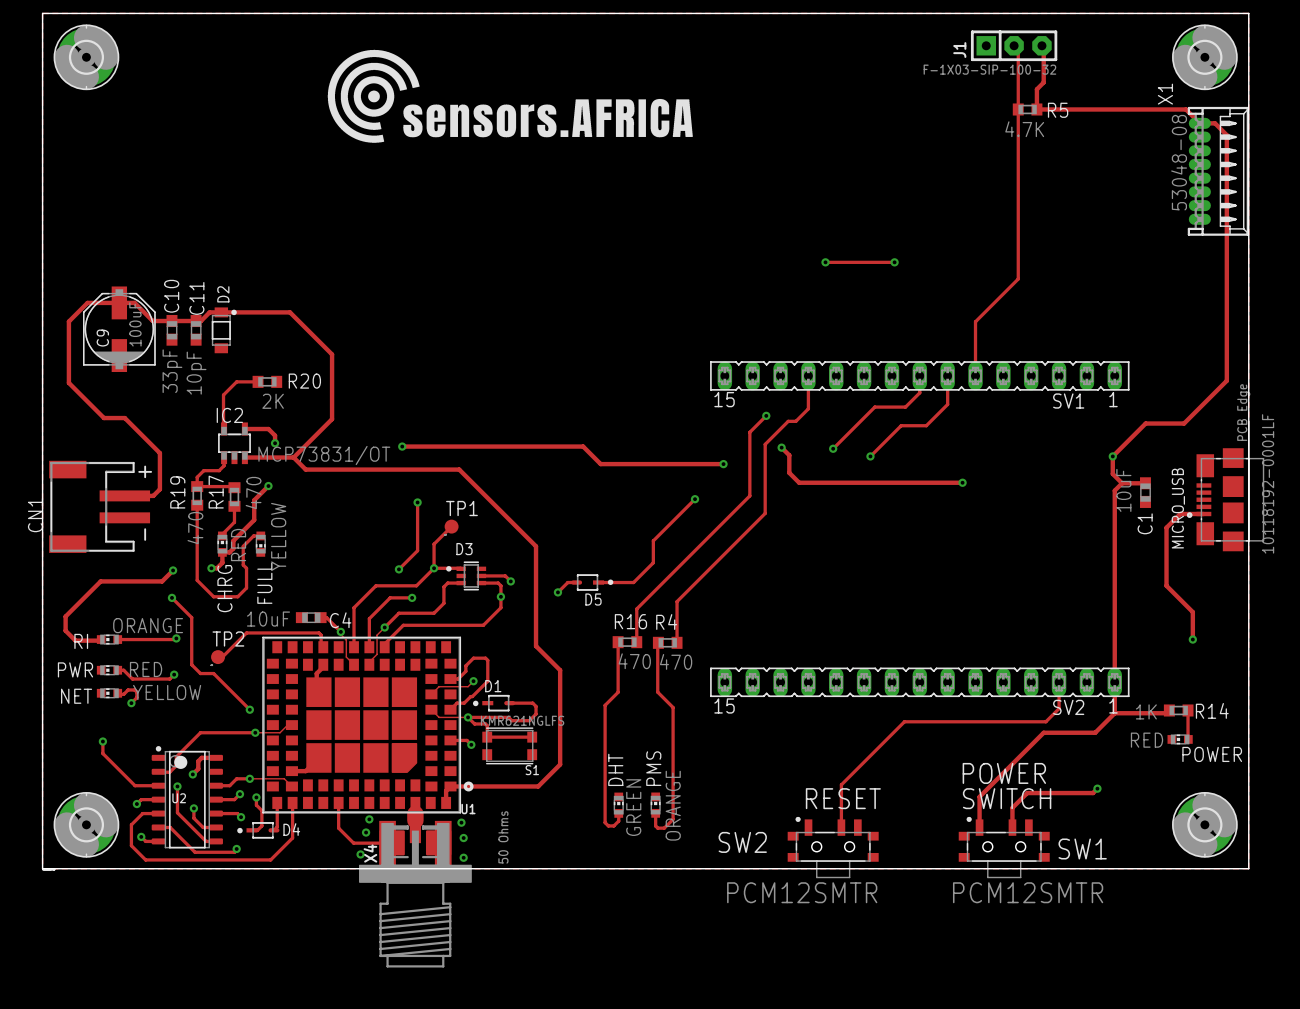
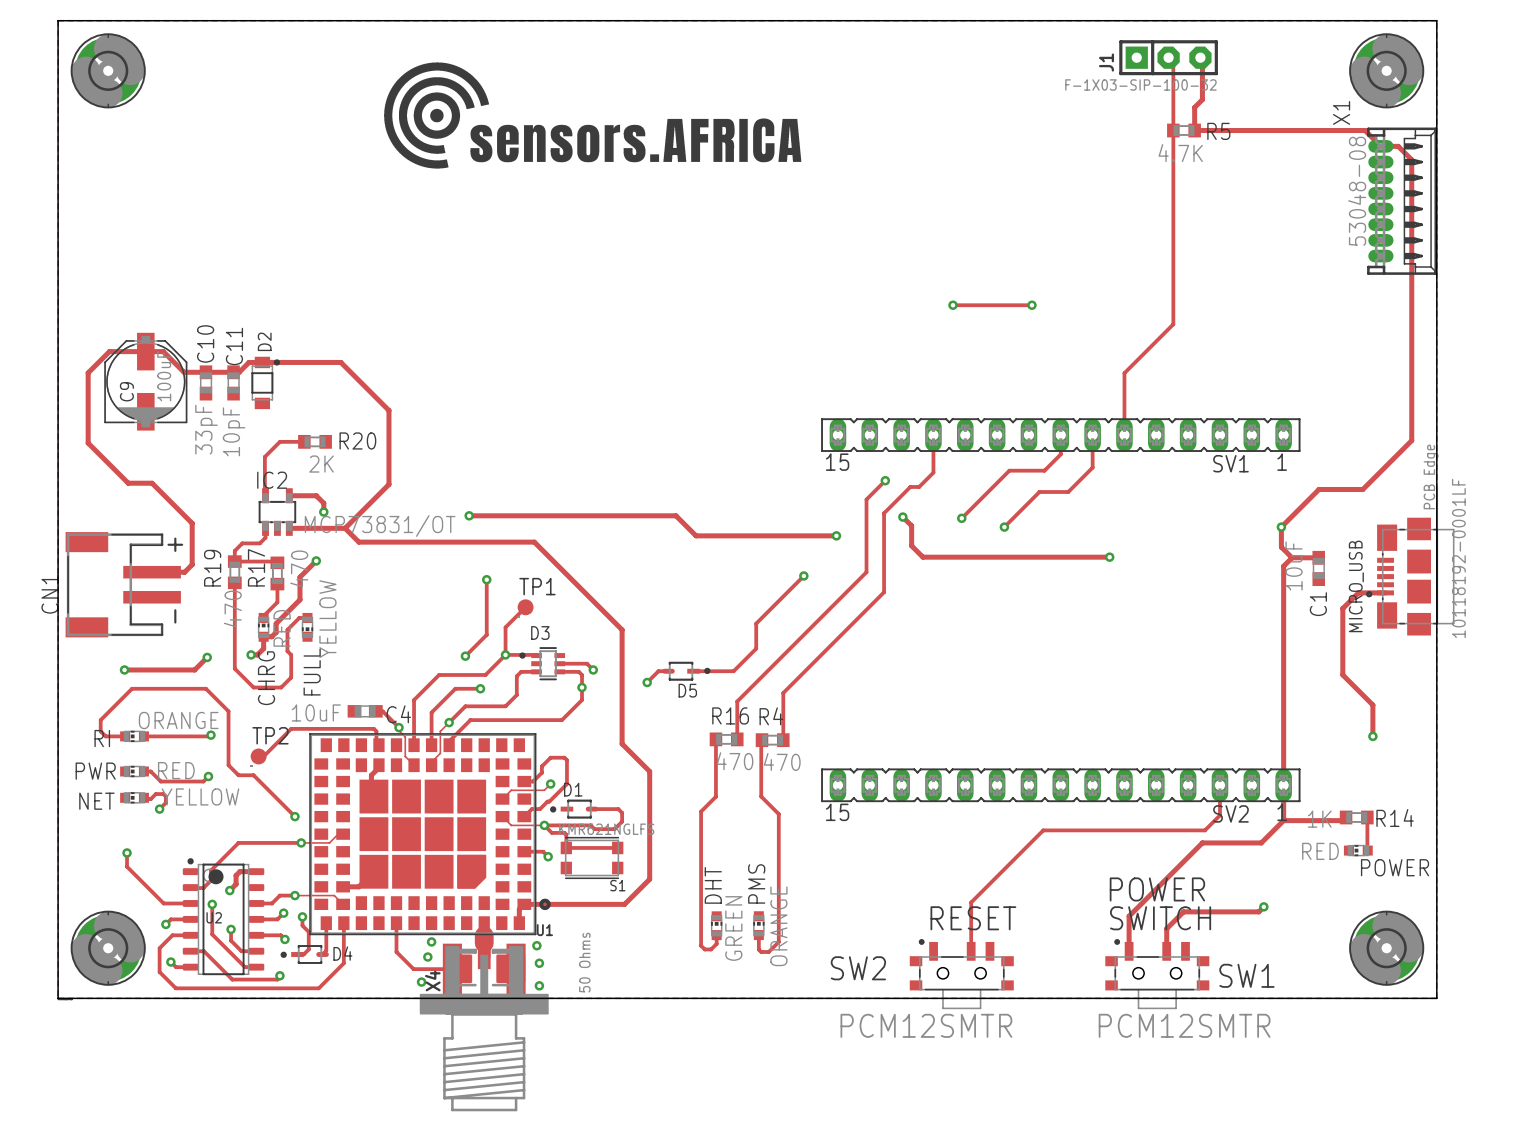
track: (100, 581) (65, 616) (65, 630) (75, 640) (101, 639) -> (205, 688) (132, 688) (100, 720) (100, 731) (105, 736) (125, 736)
via: none -> (124, 669)
via: (171, 597) -> none

